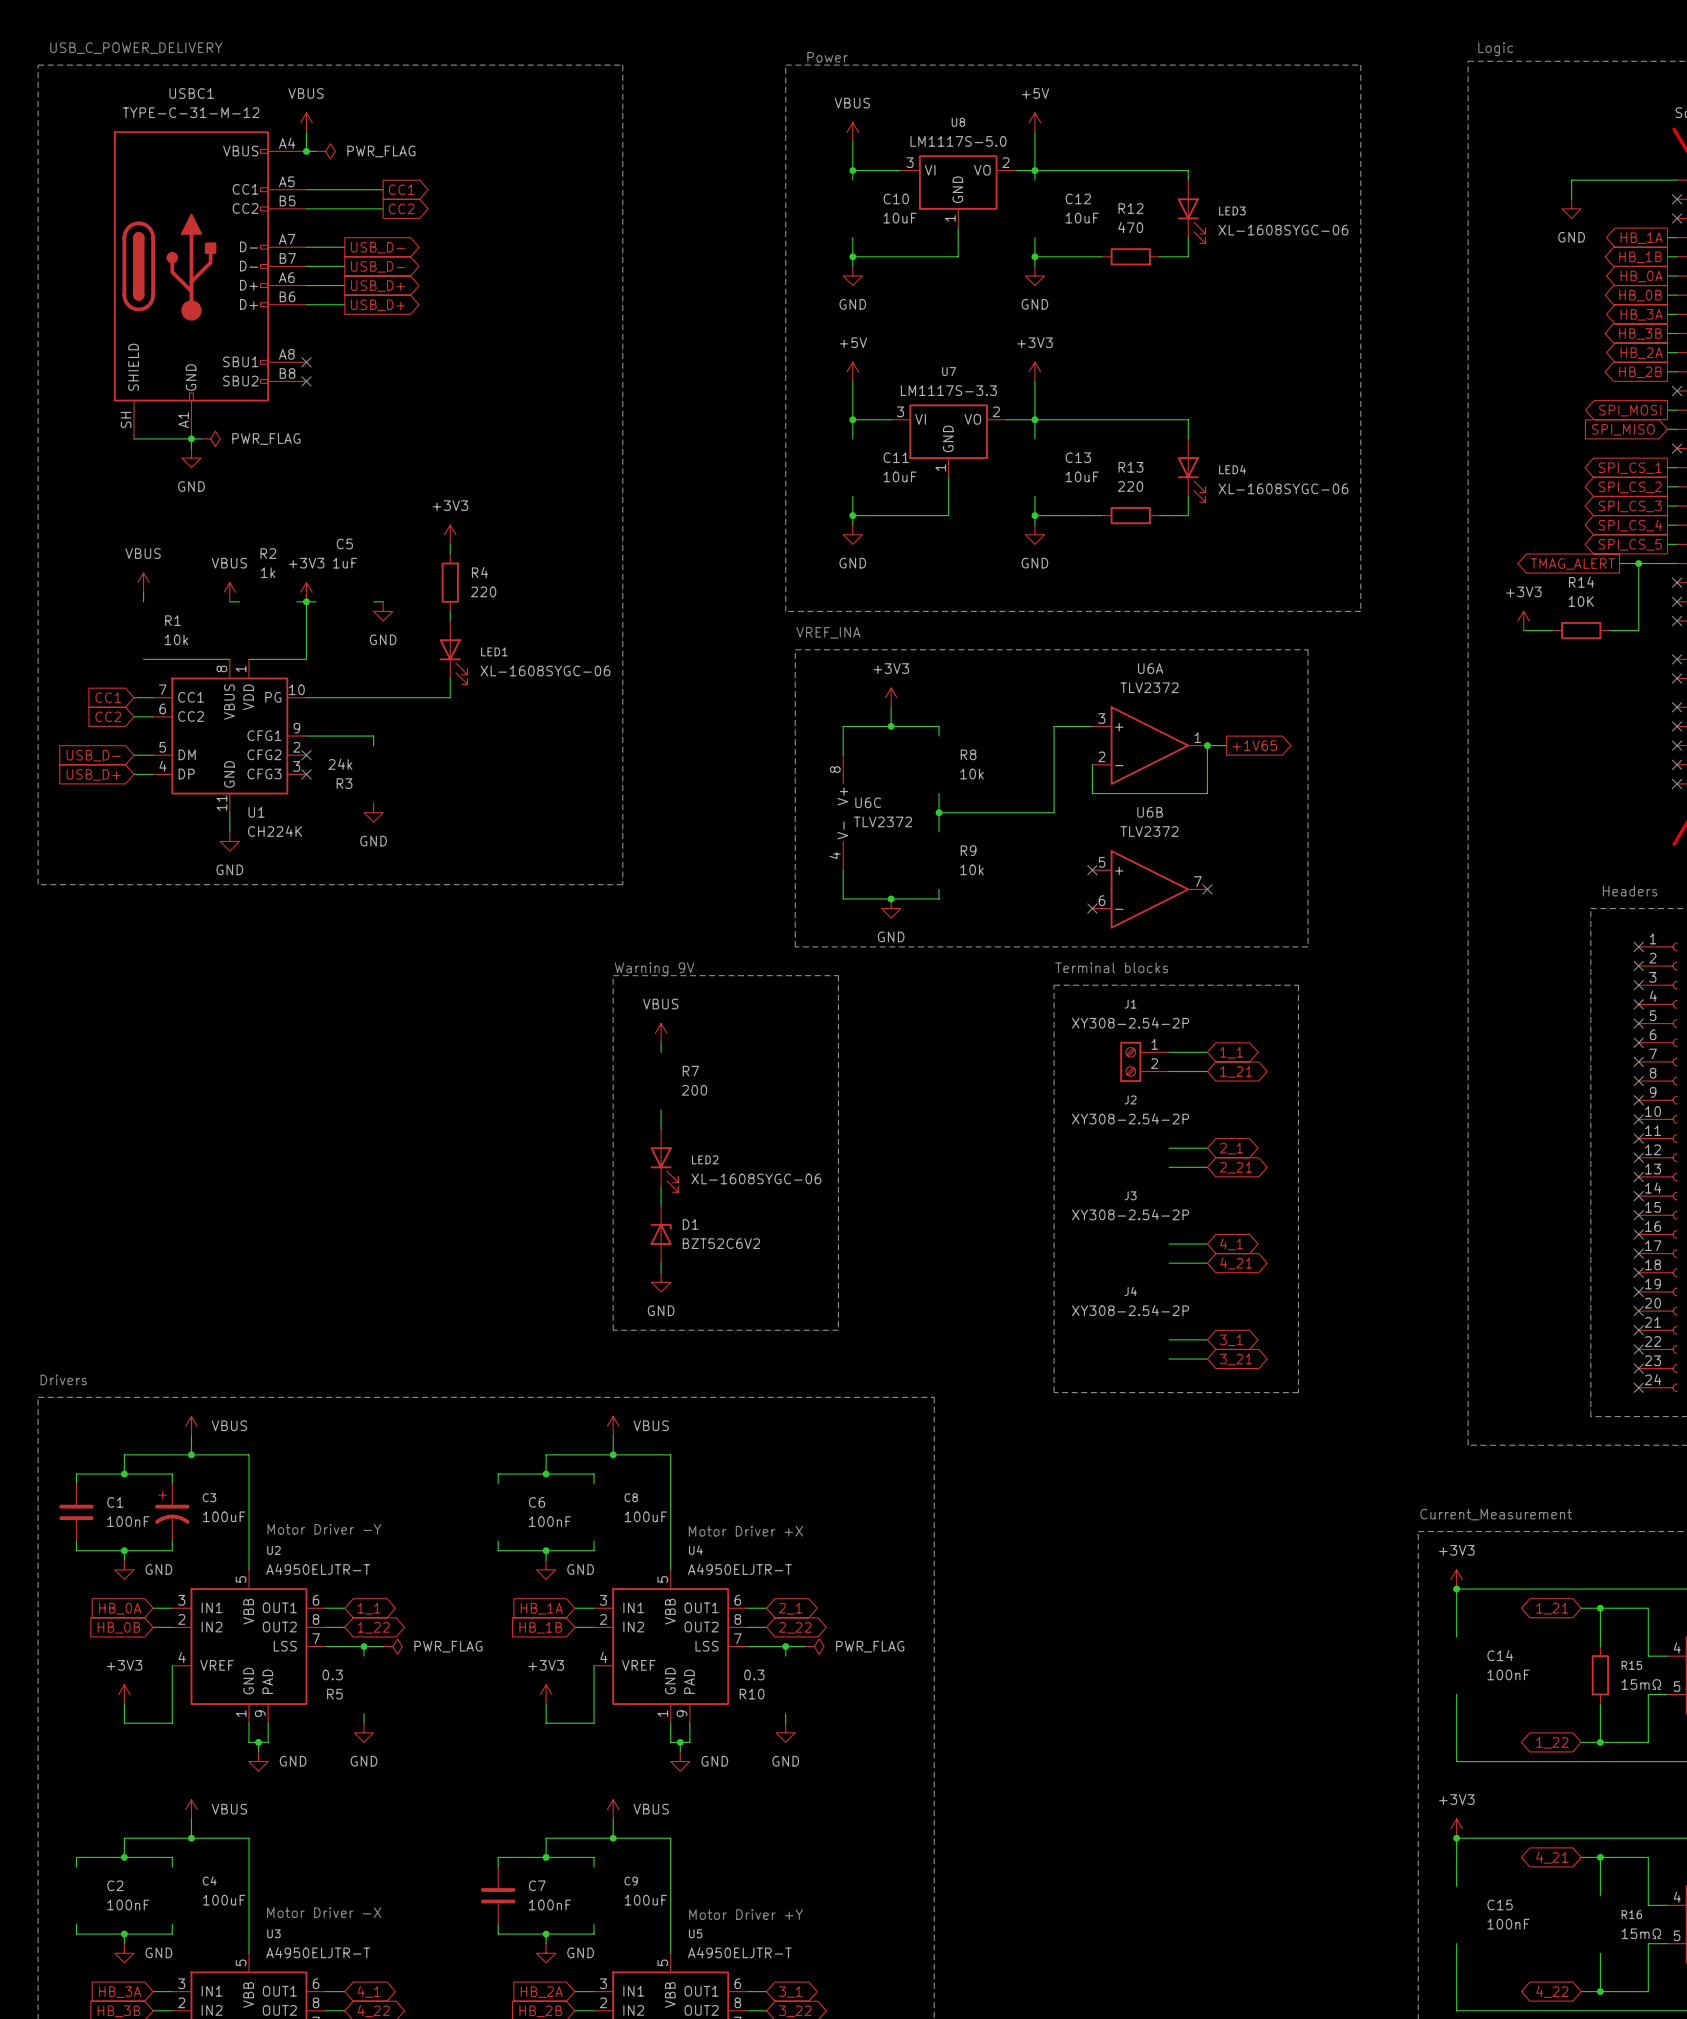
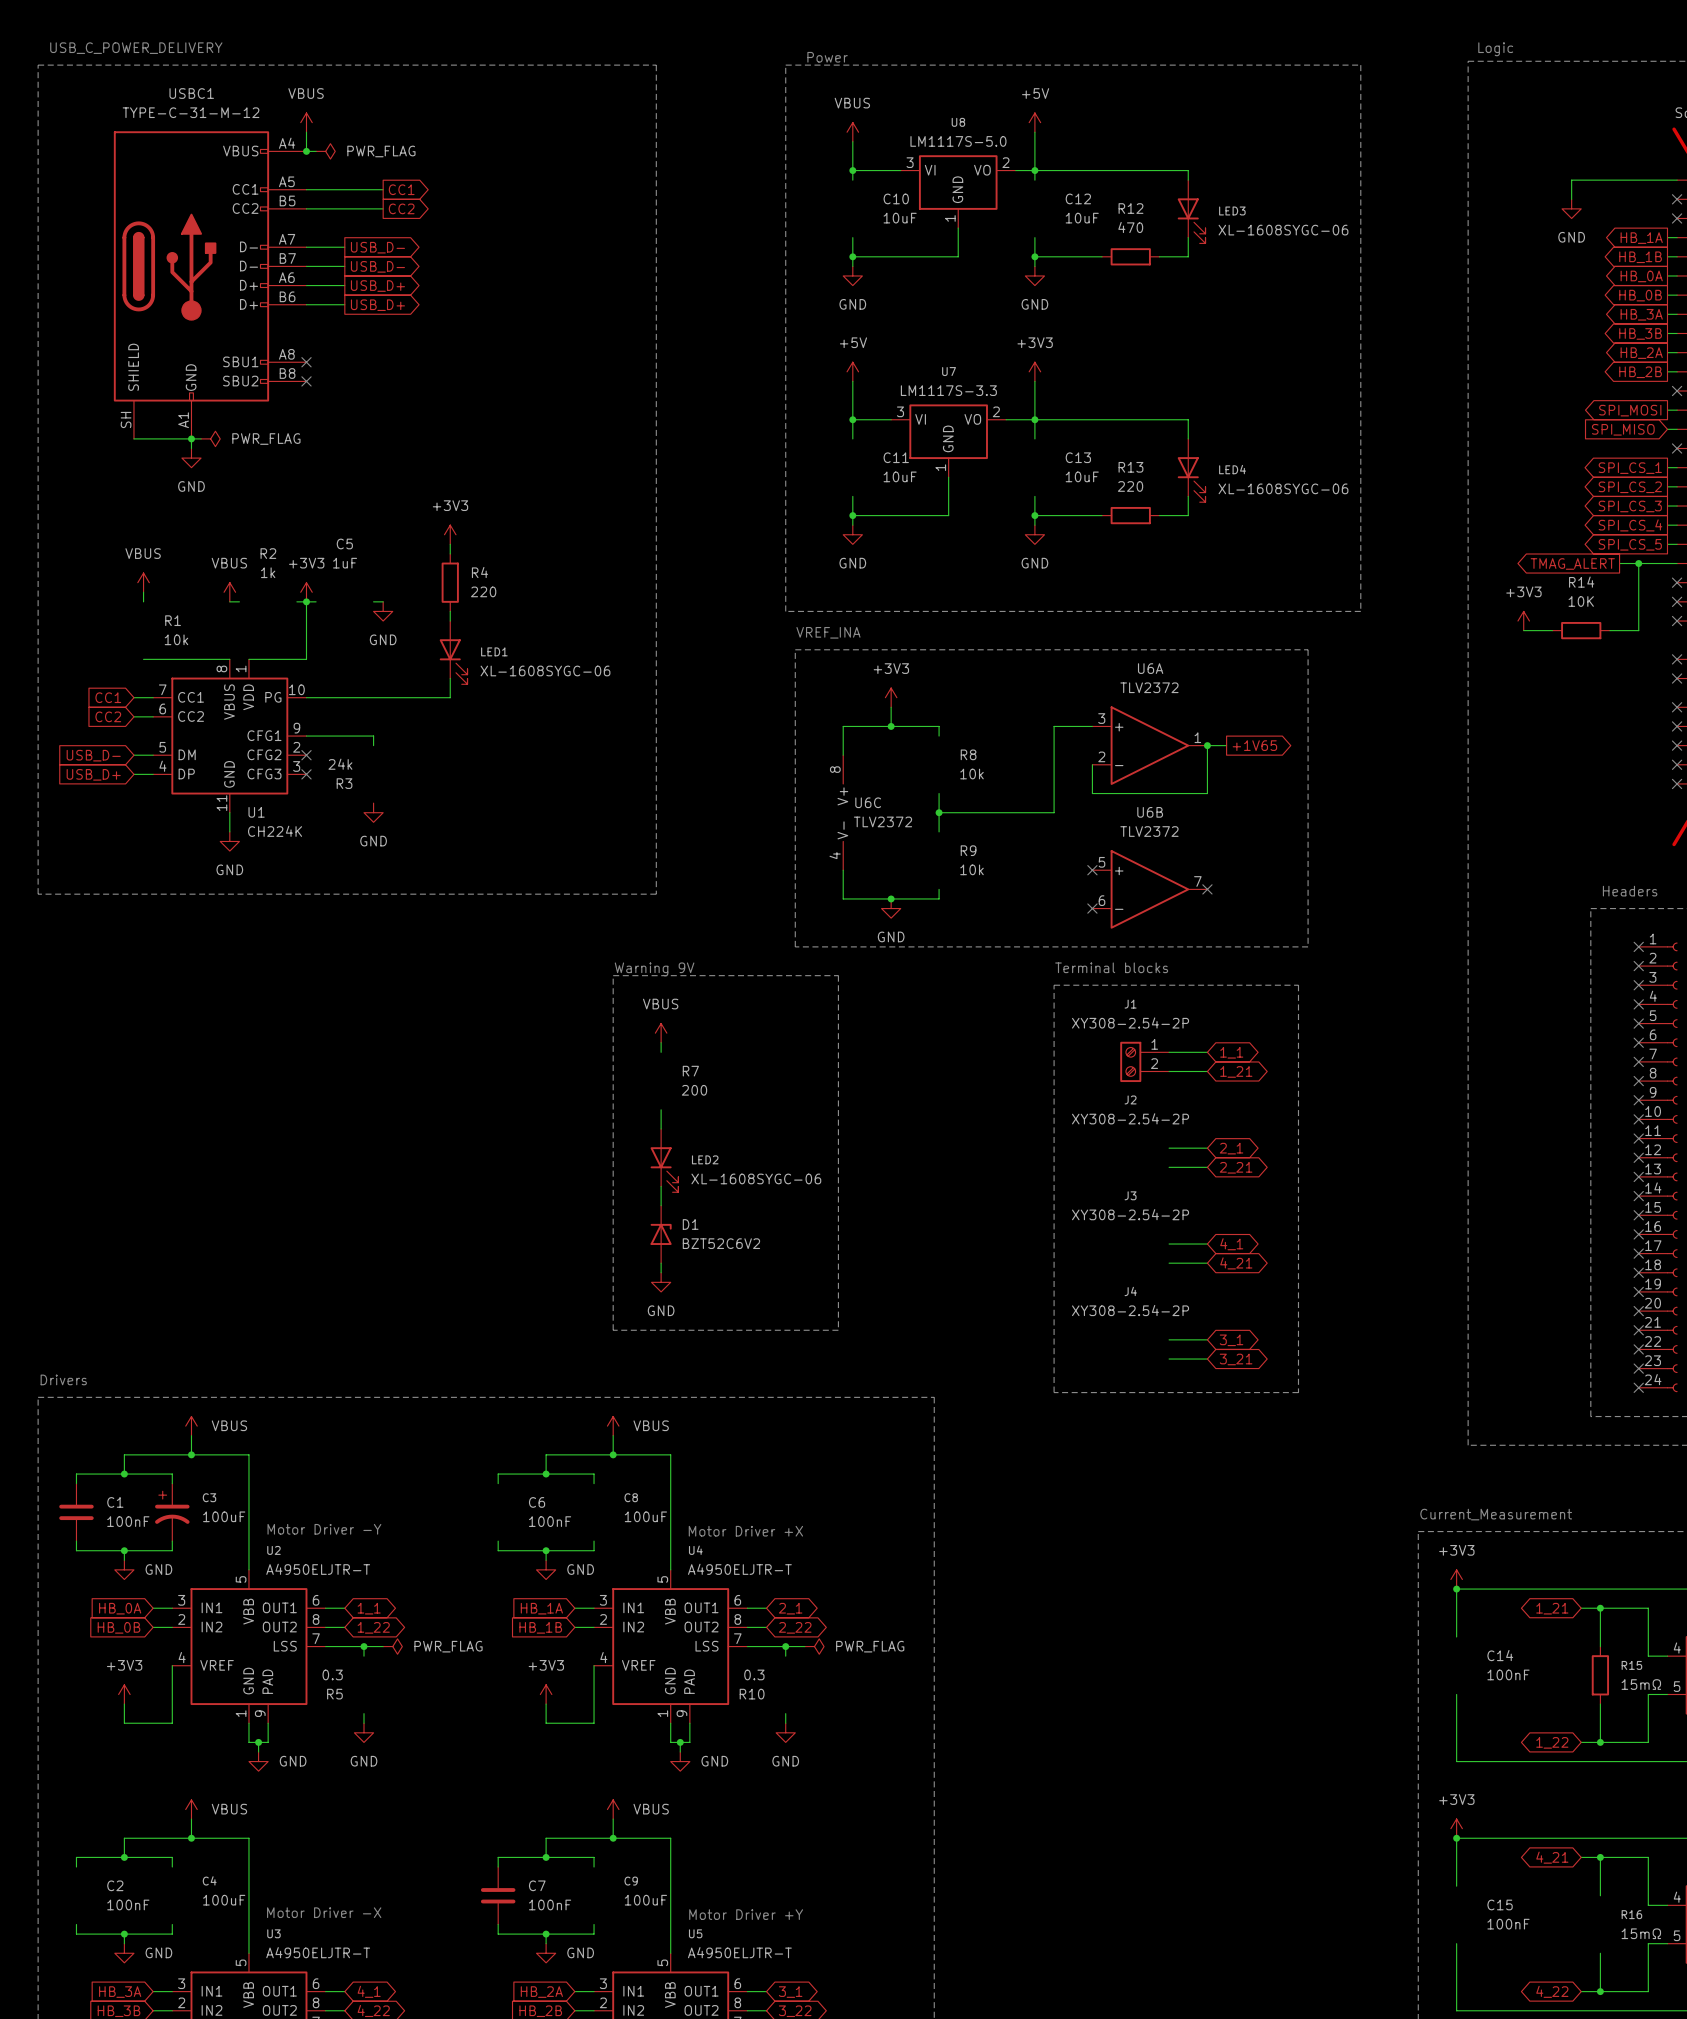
line: (622, 65) (622, 884) (38, 884) -> (622, 65) (656, 65) (656, 894) (38, 894) (38, 884)

